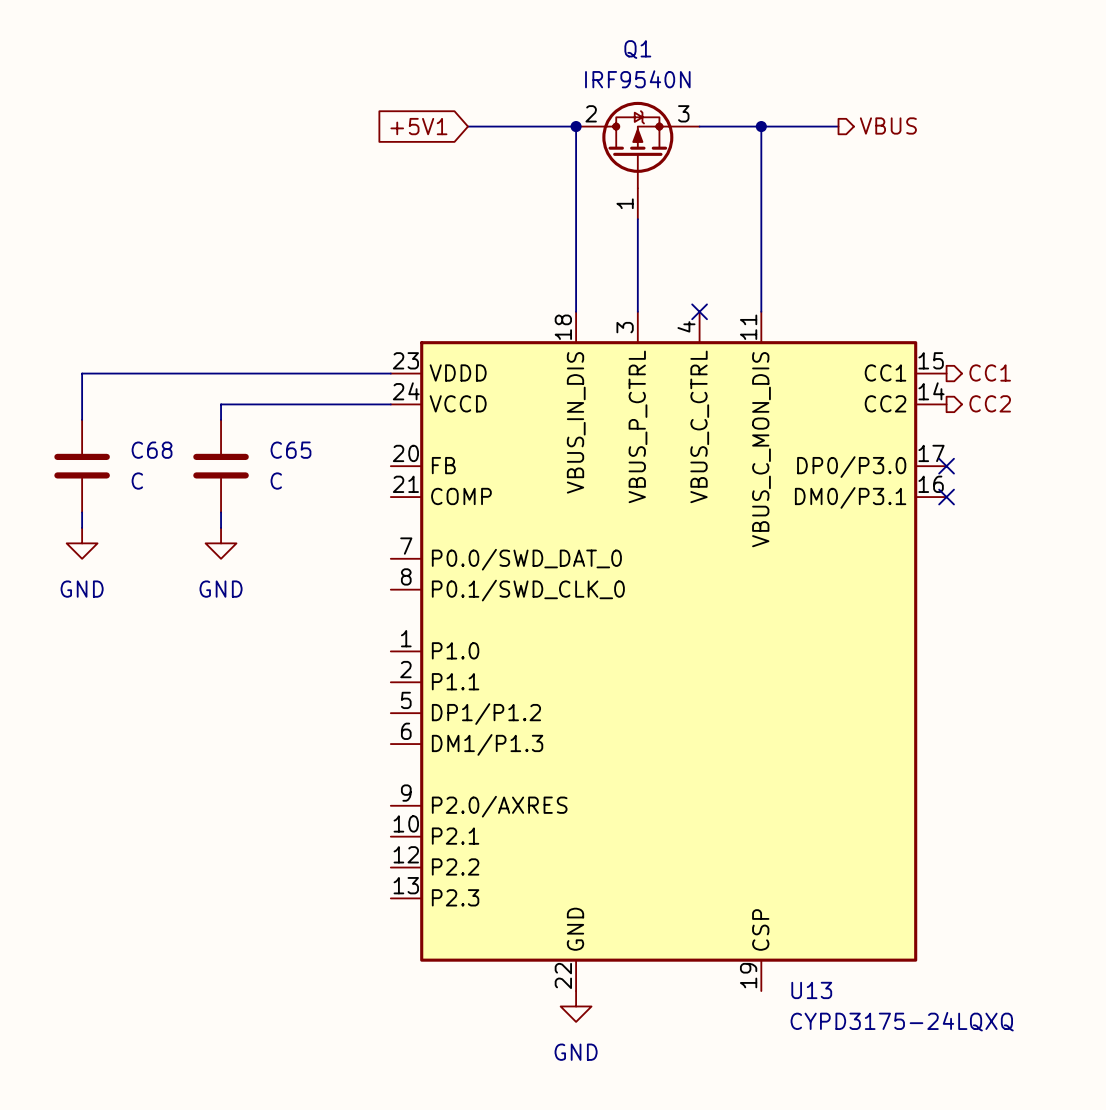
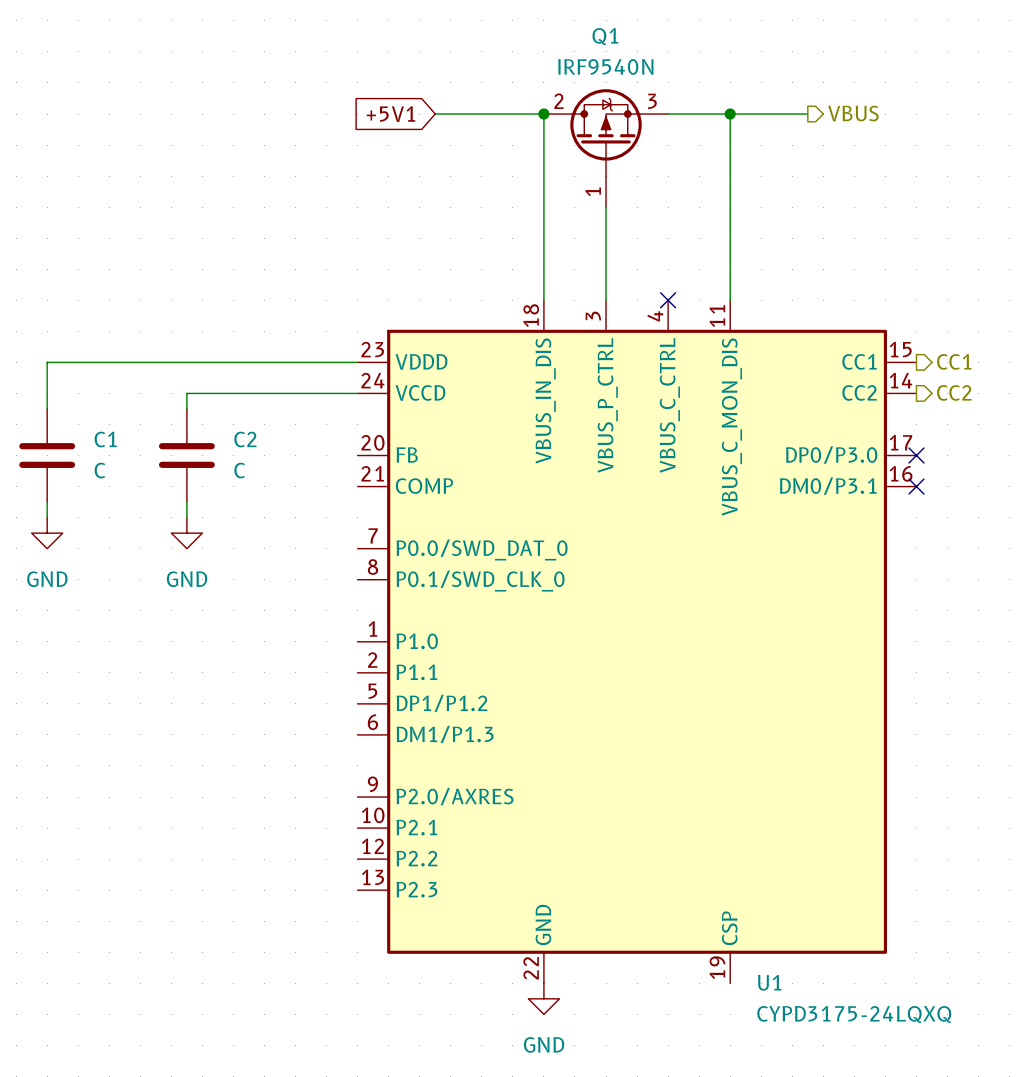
C68 name: C68 (152, 450) -> C1 (105, 439)
C65 name: C65 (290, 450) -> C2 (245, 439)
U13 name: U13 (811, 990) -> U1 (769, 982)

